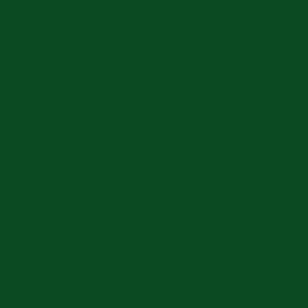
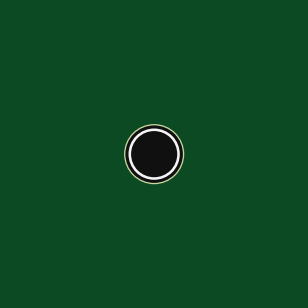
part: none -> (154, 154)

